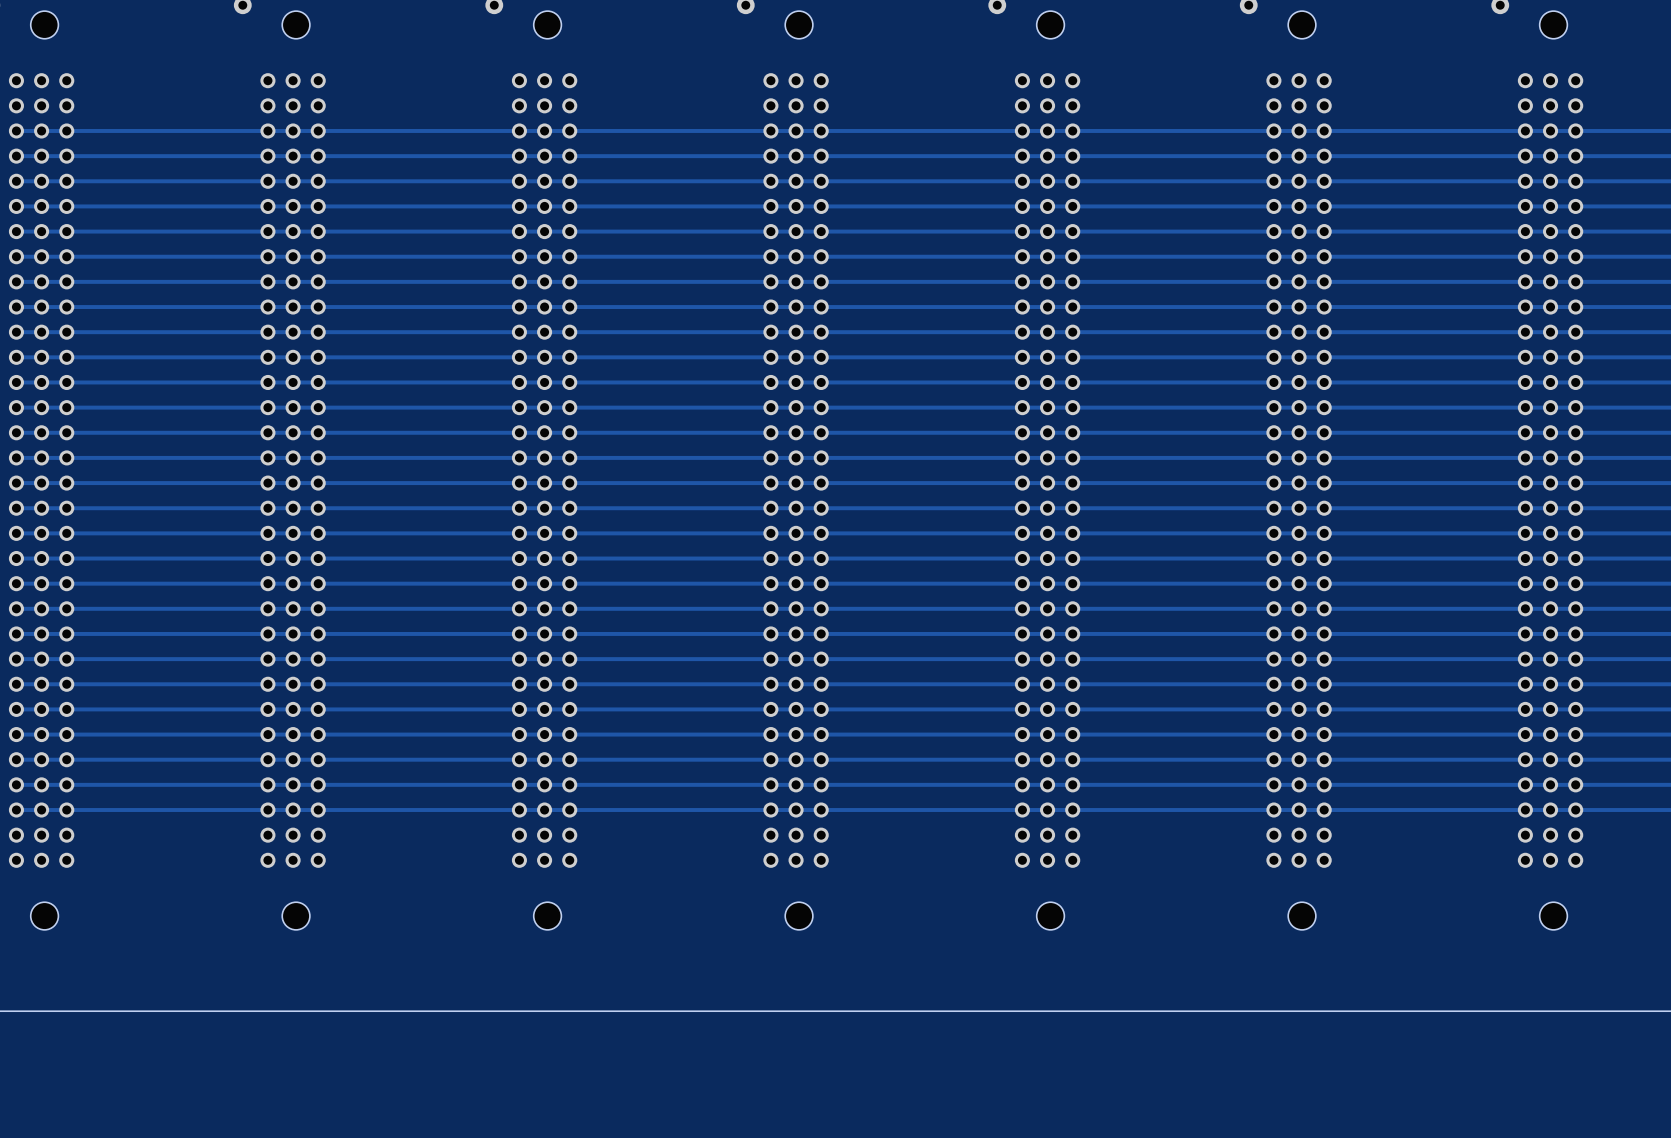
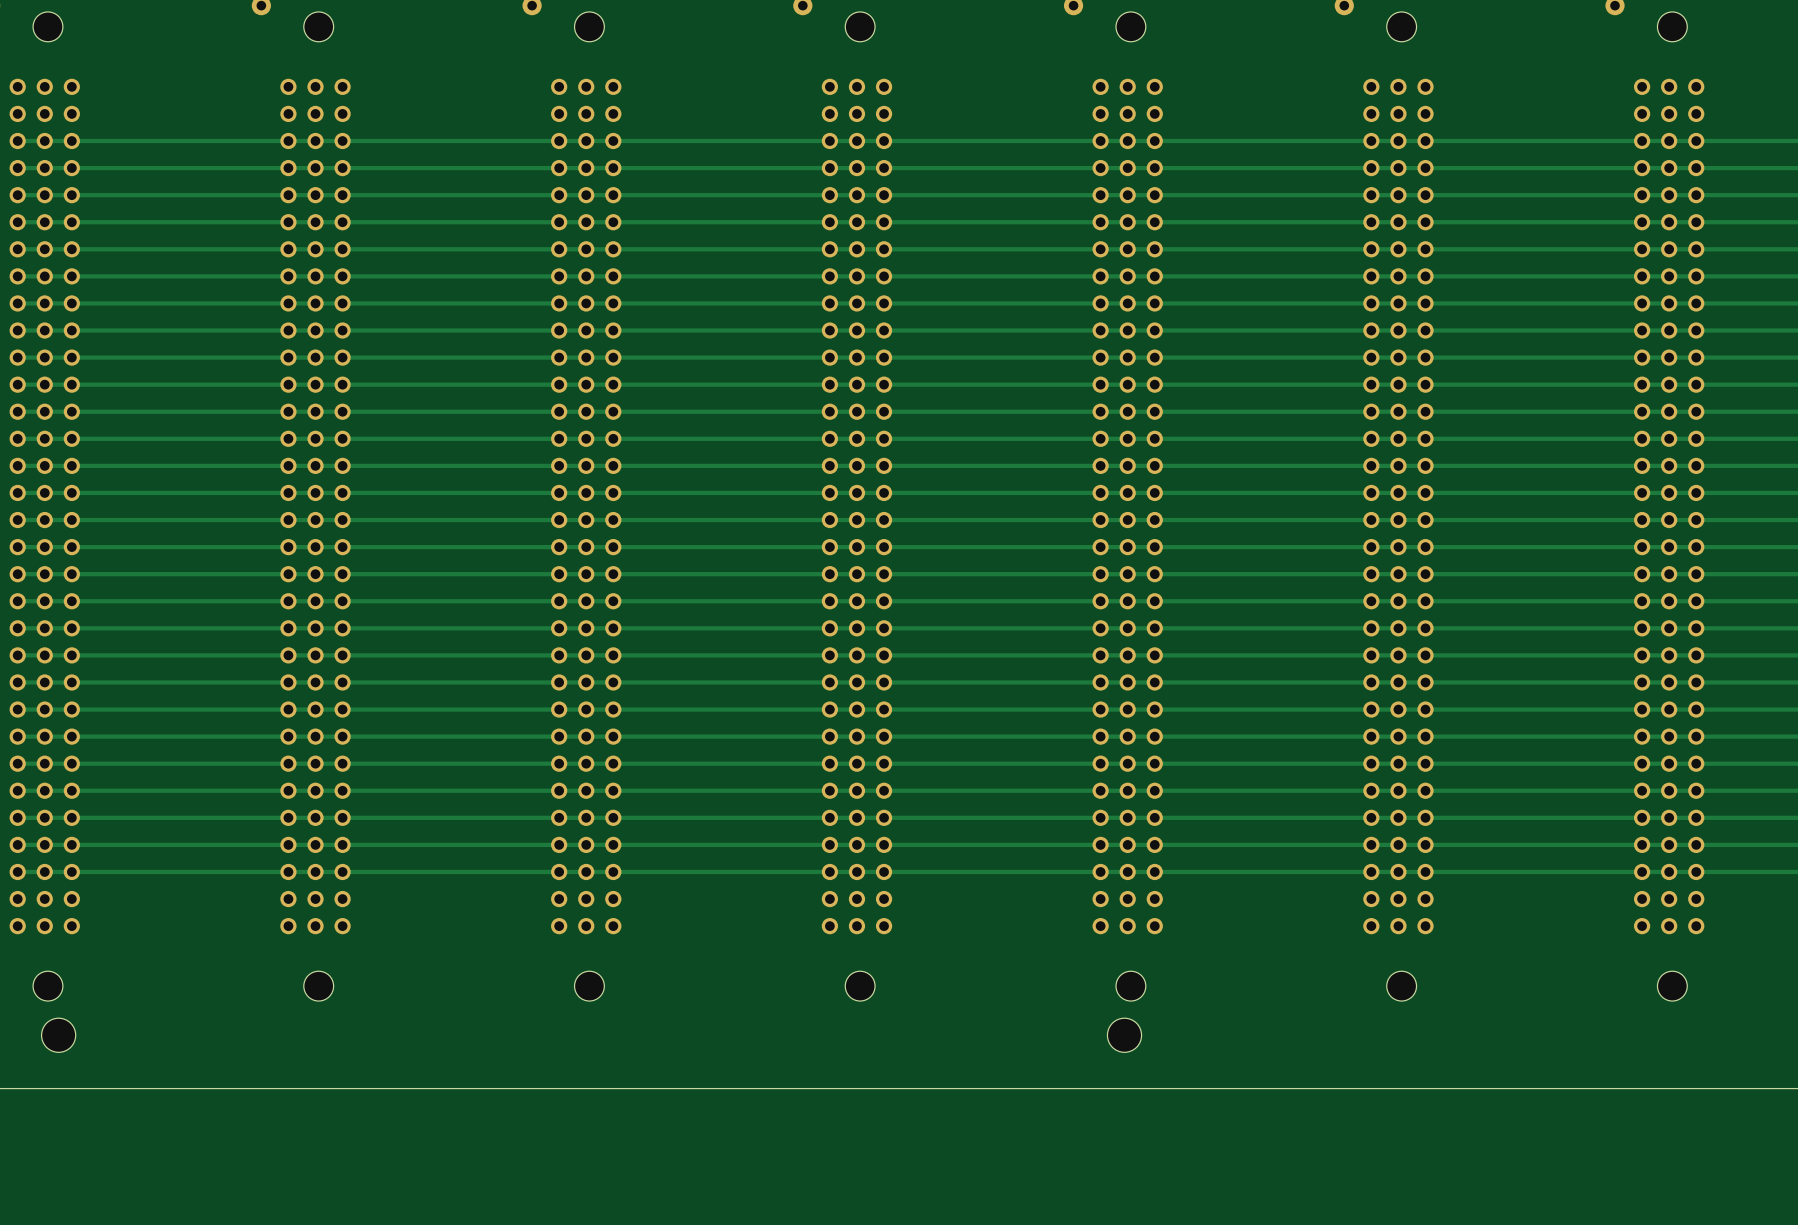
hole: none -> (58, 1035)
hole: none -> (1124, 1035)

